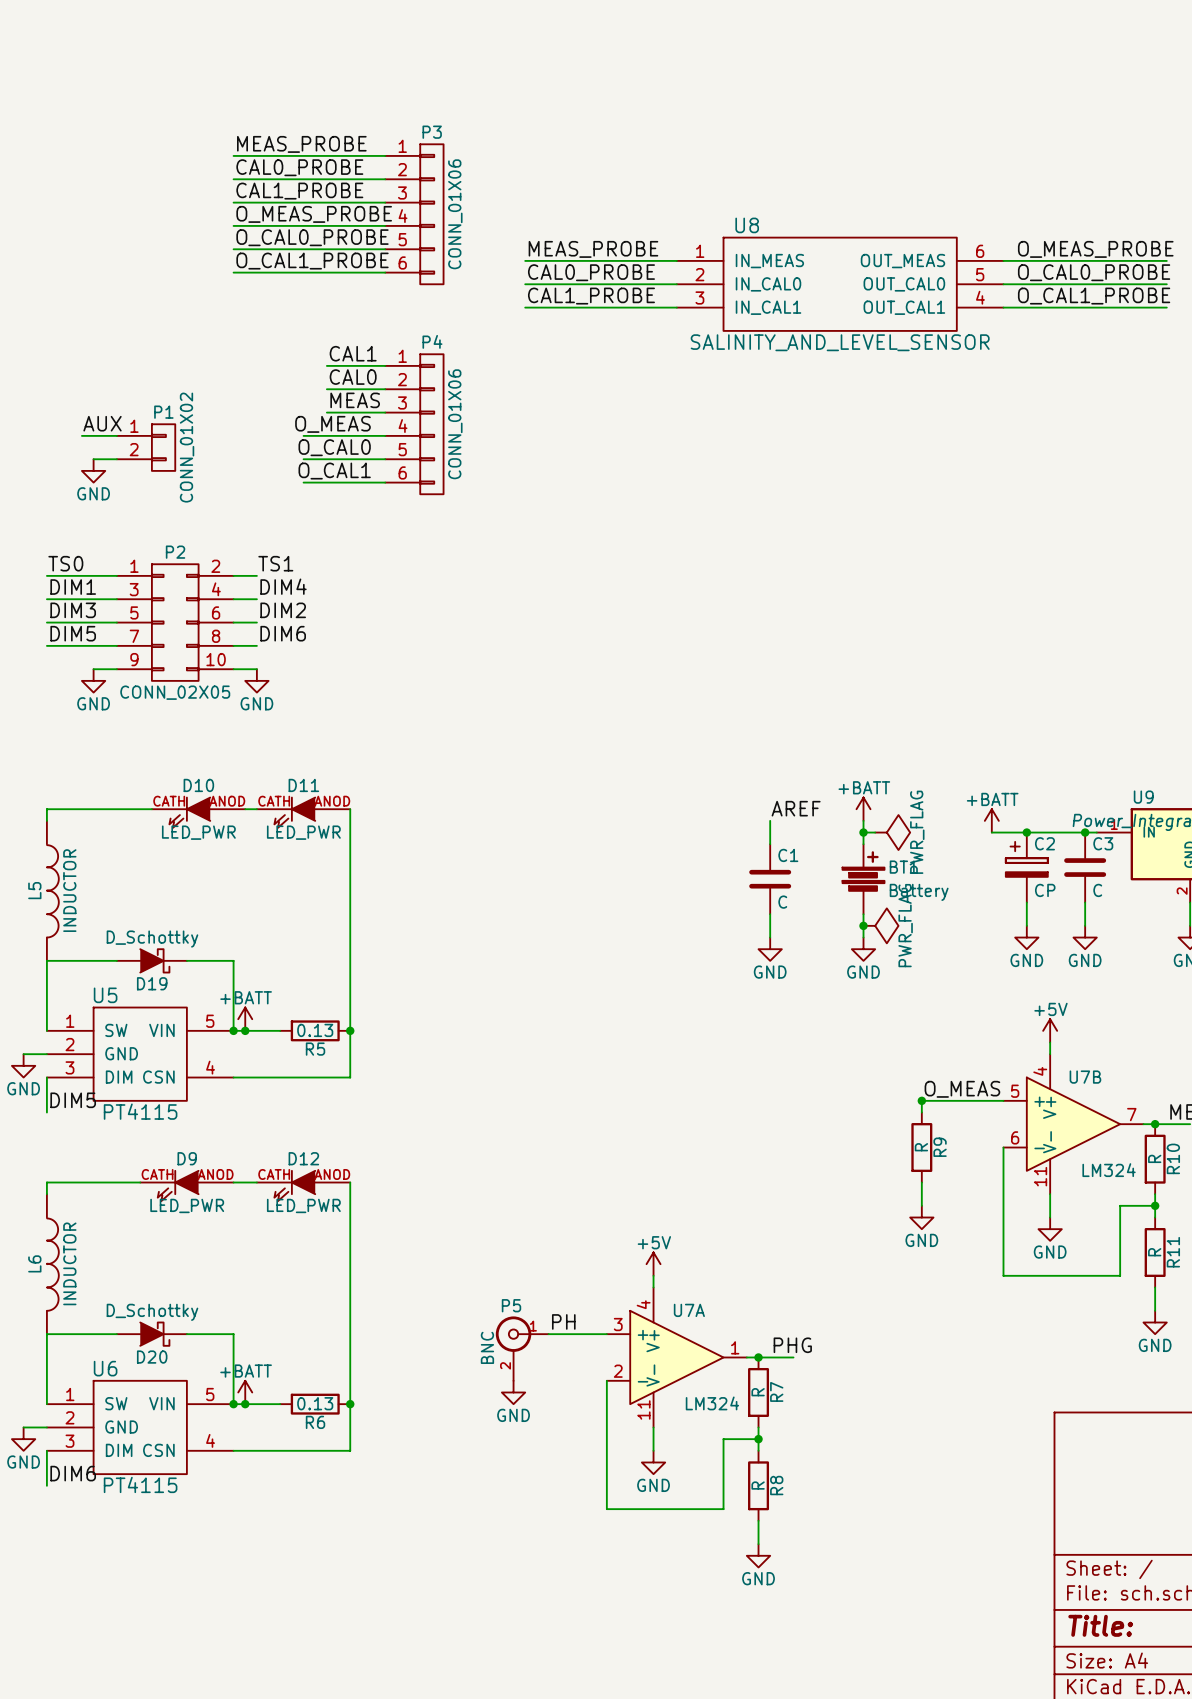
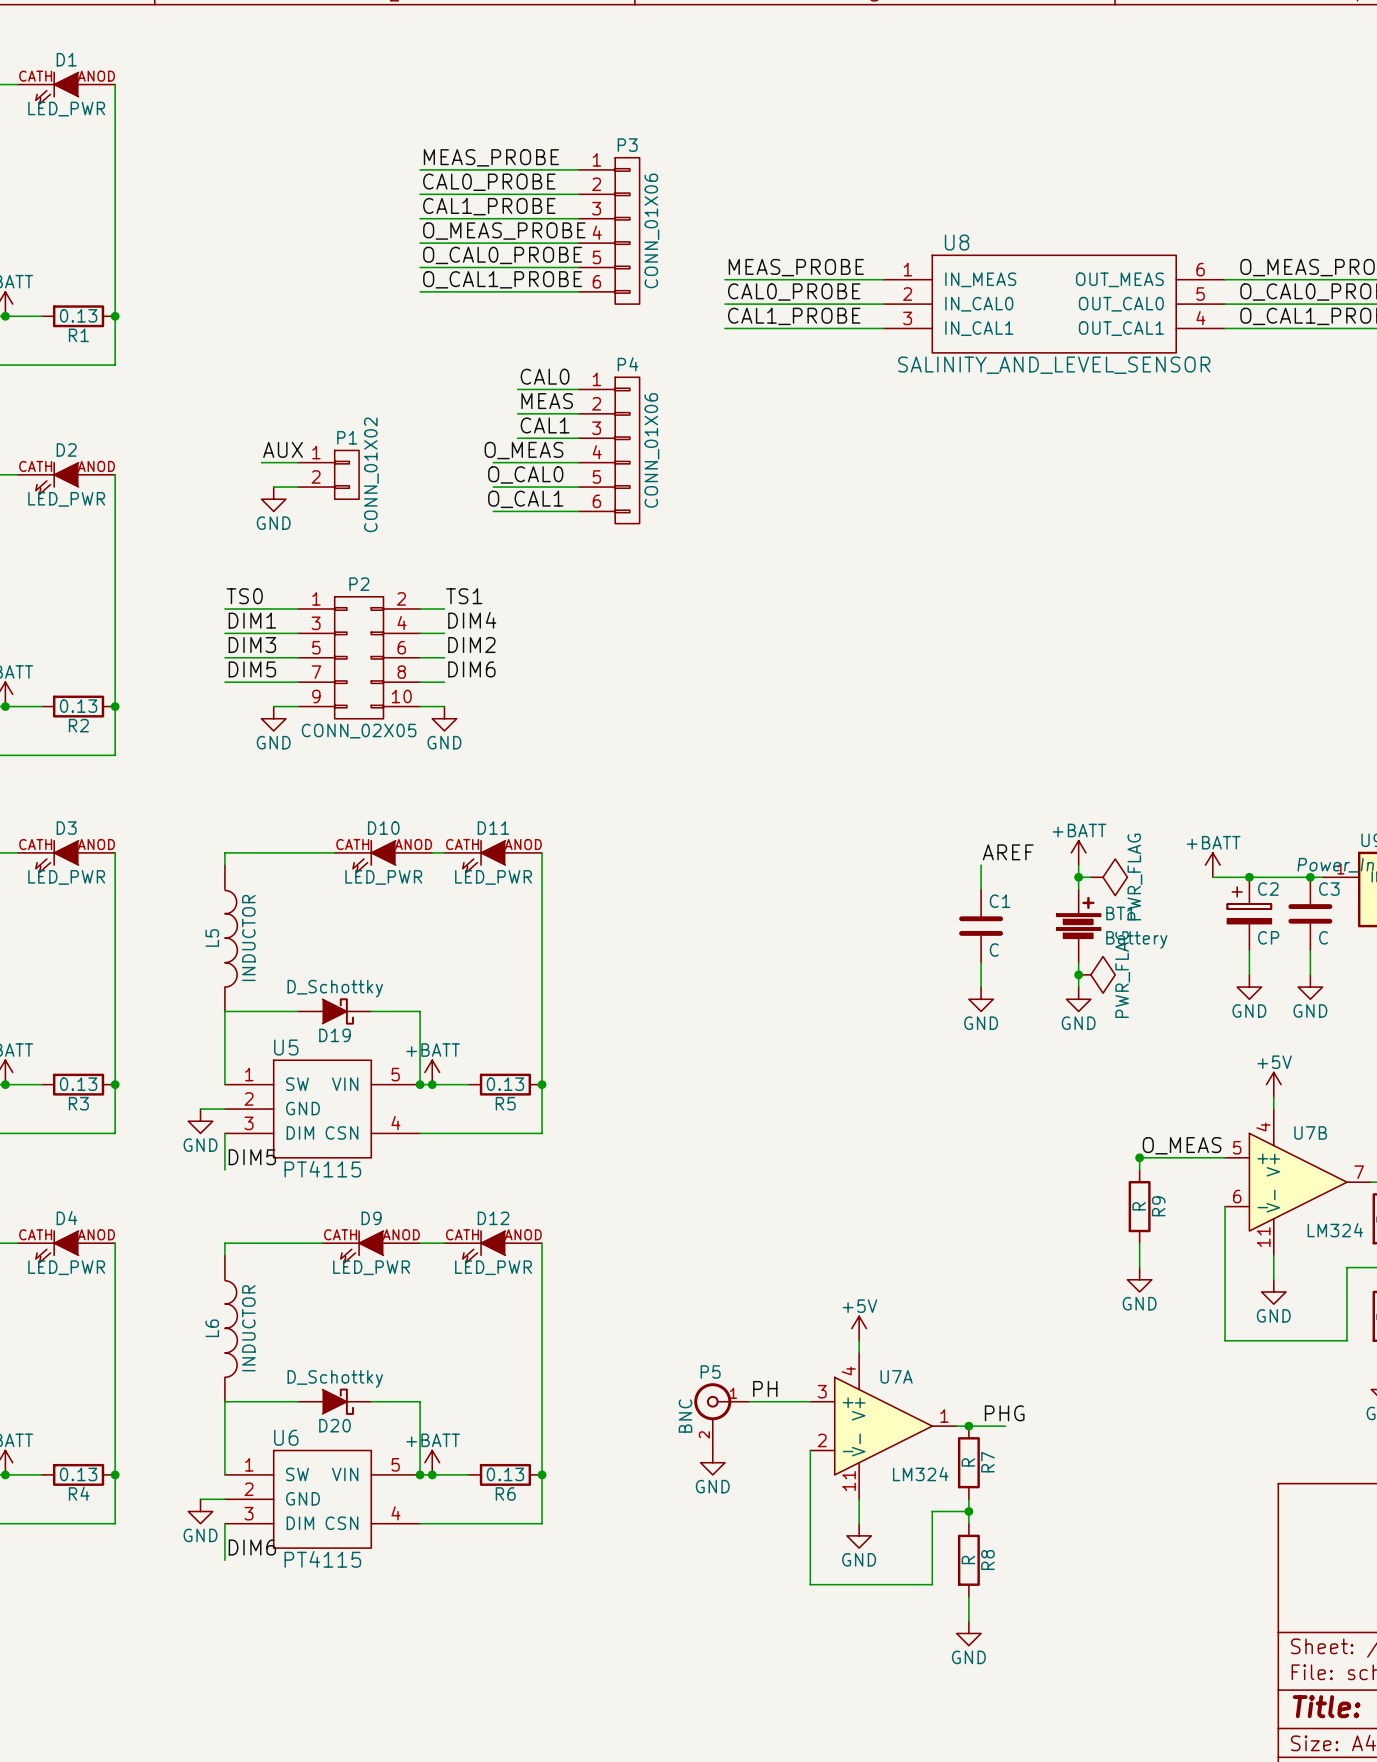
label: CAL1 (353, 353) -> CAL0 (545, 376)
label: CAL0 (353, 377) -> MEAS (547, 401)
label: MEAS (355, 400) -> CAL1 (545, 425)

